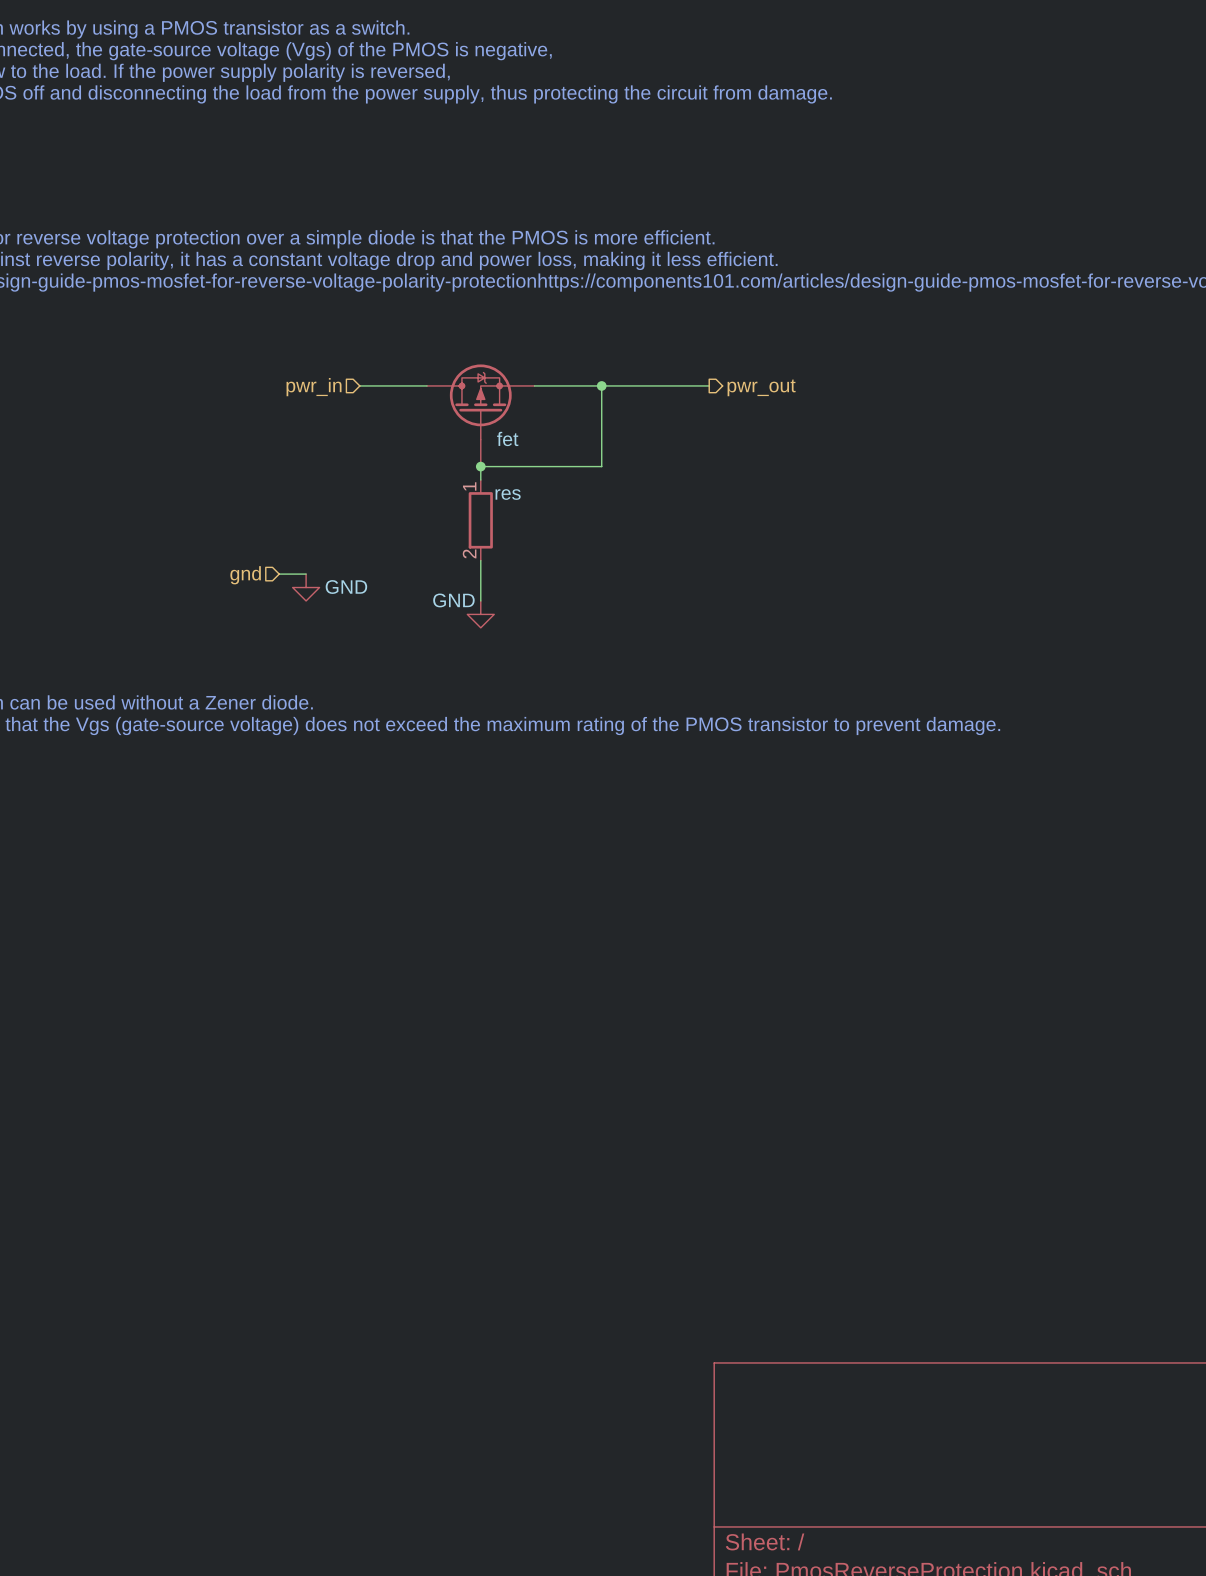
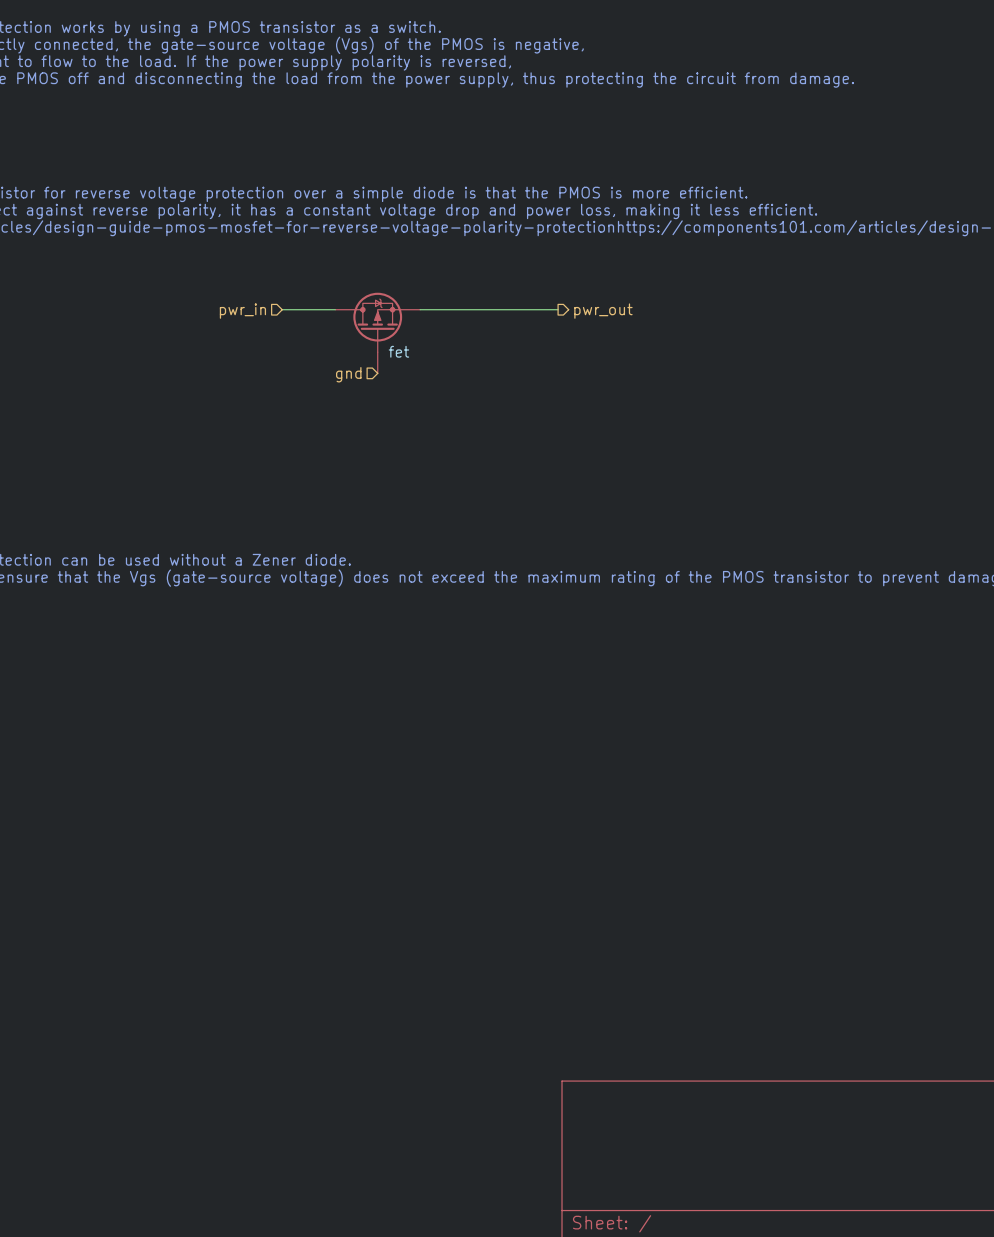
wire: (601, 385) (601, 466) (480, 466) (480, 480) -> none
junction: (601, 385) -> none
junction: (480, 466) -> none
res: (480, 520) -> none
wire: (480, 560) (480, 600) -> none
wire: (279, 574) (306, 574) -> none
hierarchical label position: gnd (245, 575) -> gnd (348, 374)
power symbol: GND (306, 587) -> none
power symbol: GND (480, 614) -> none

